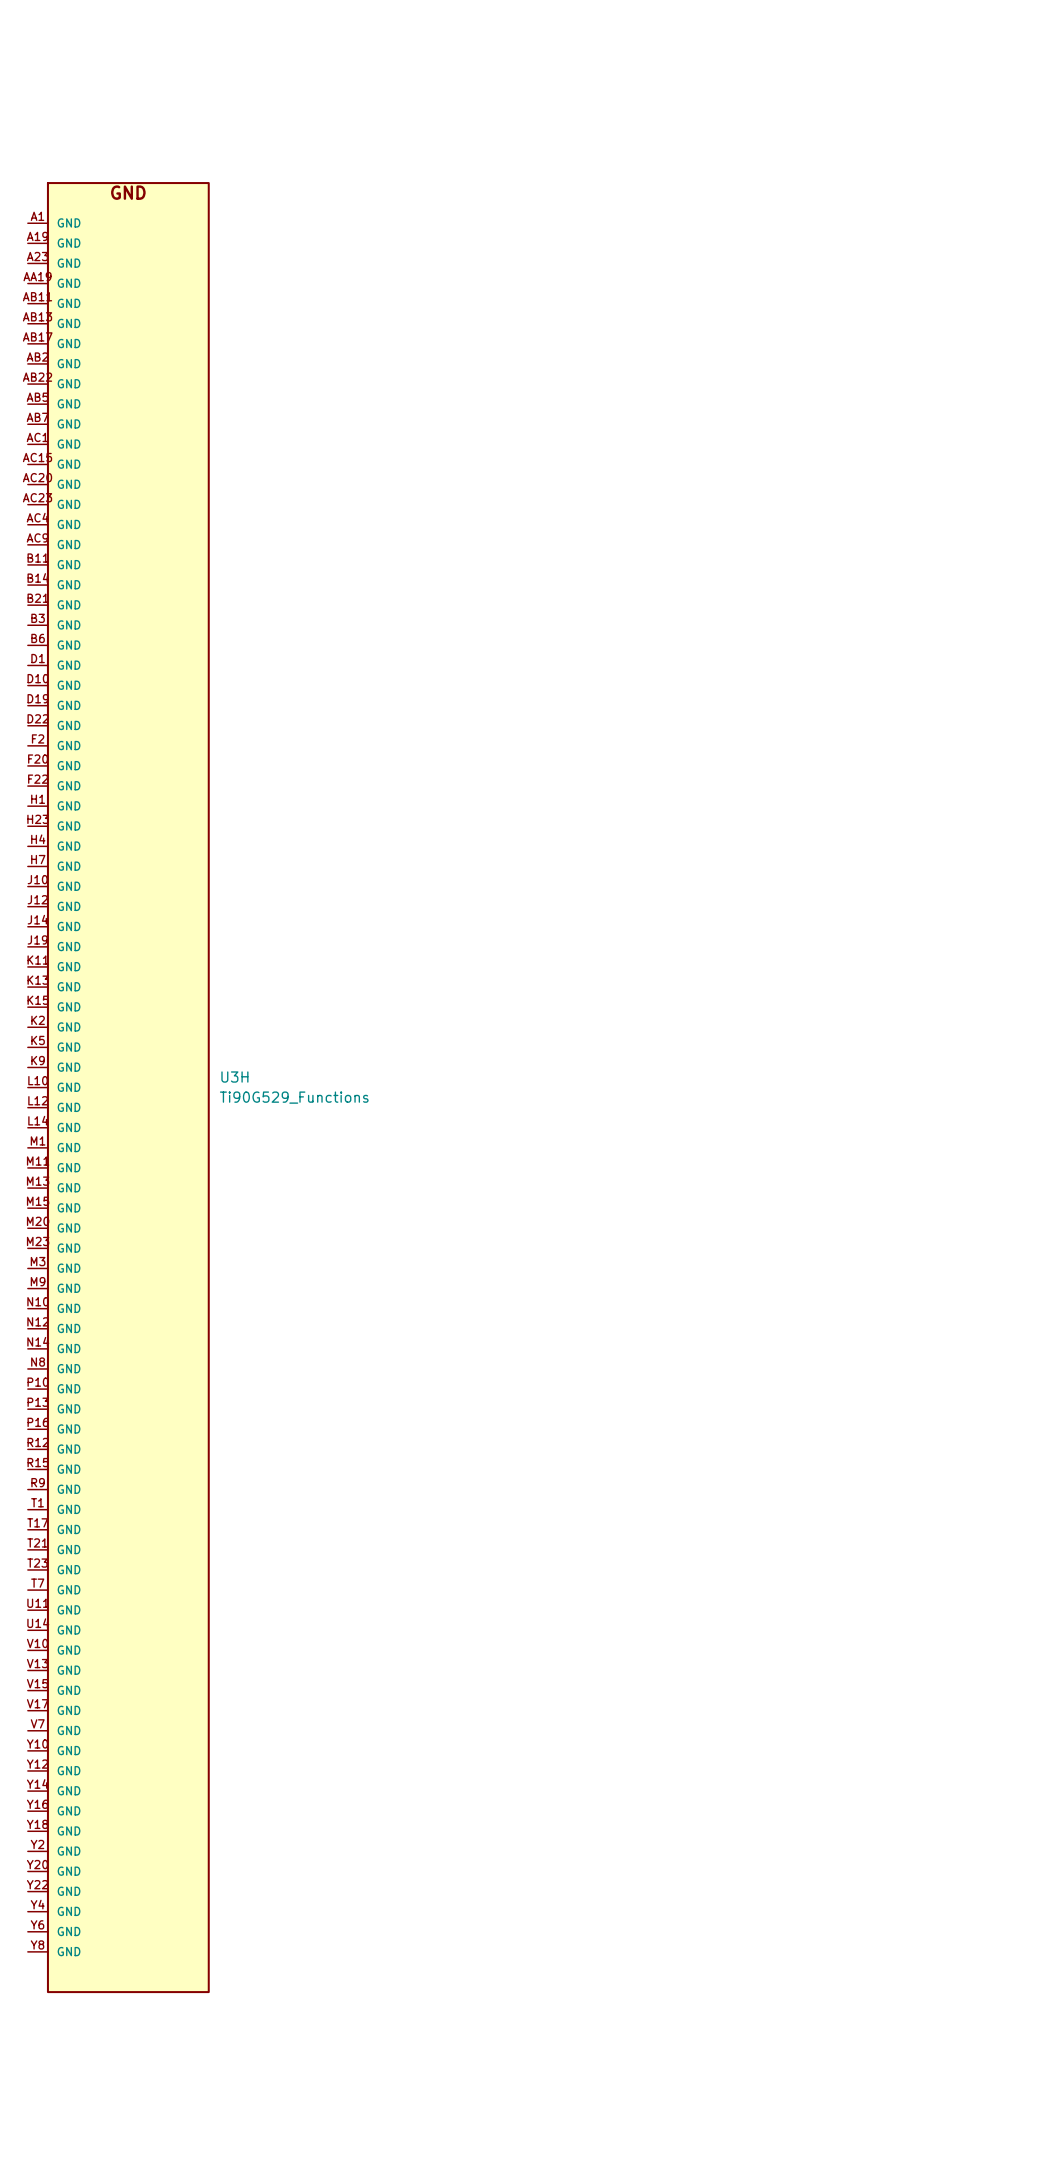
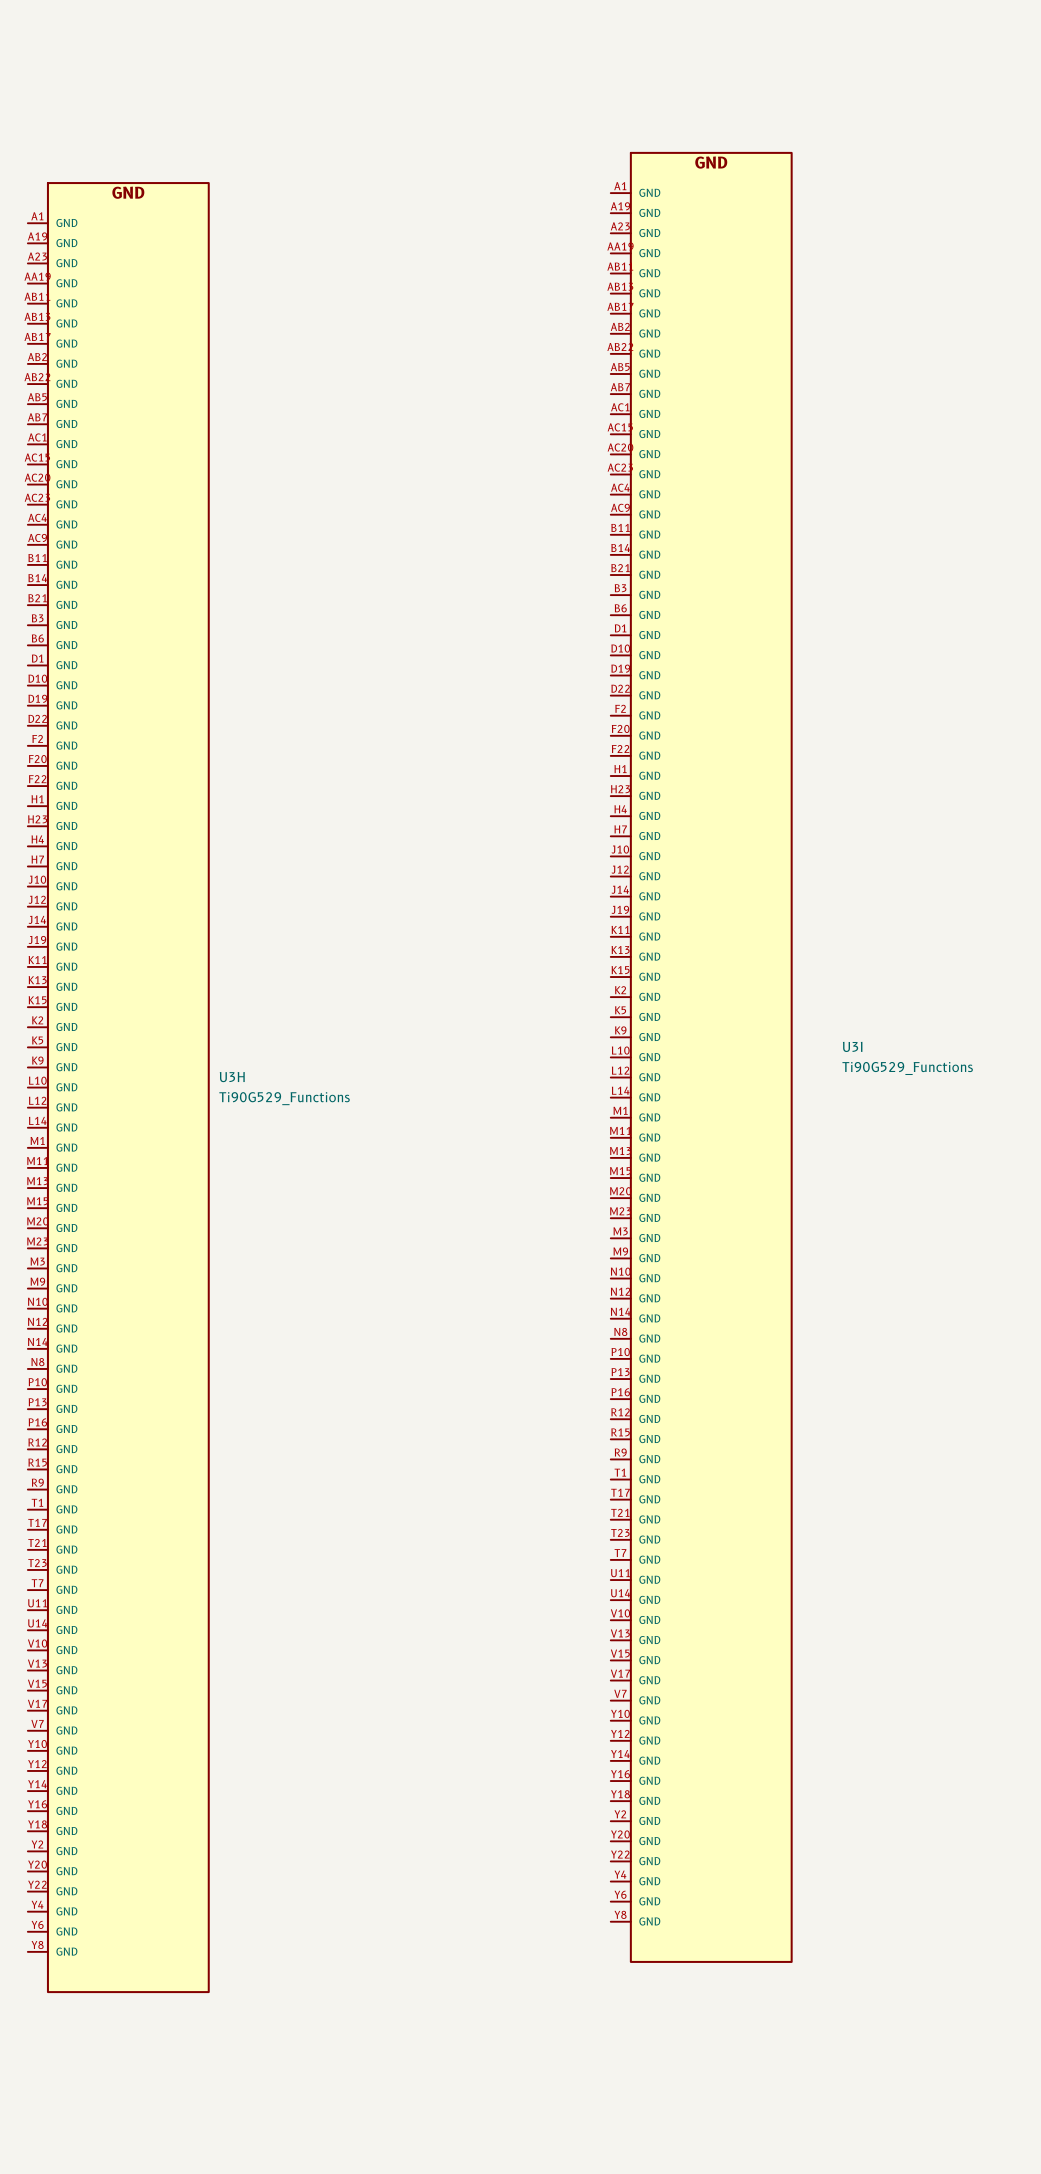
U3I: none -> Ti90G529_Functions (701, 1057)

